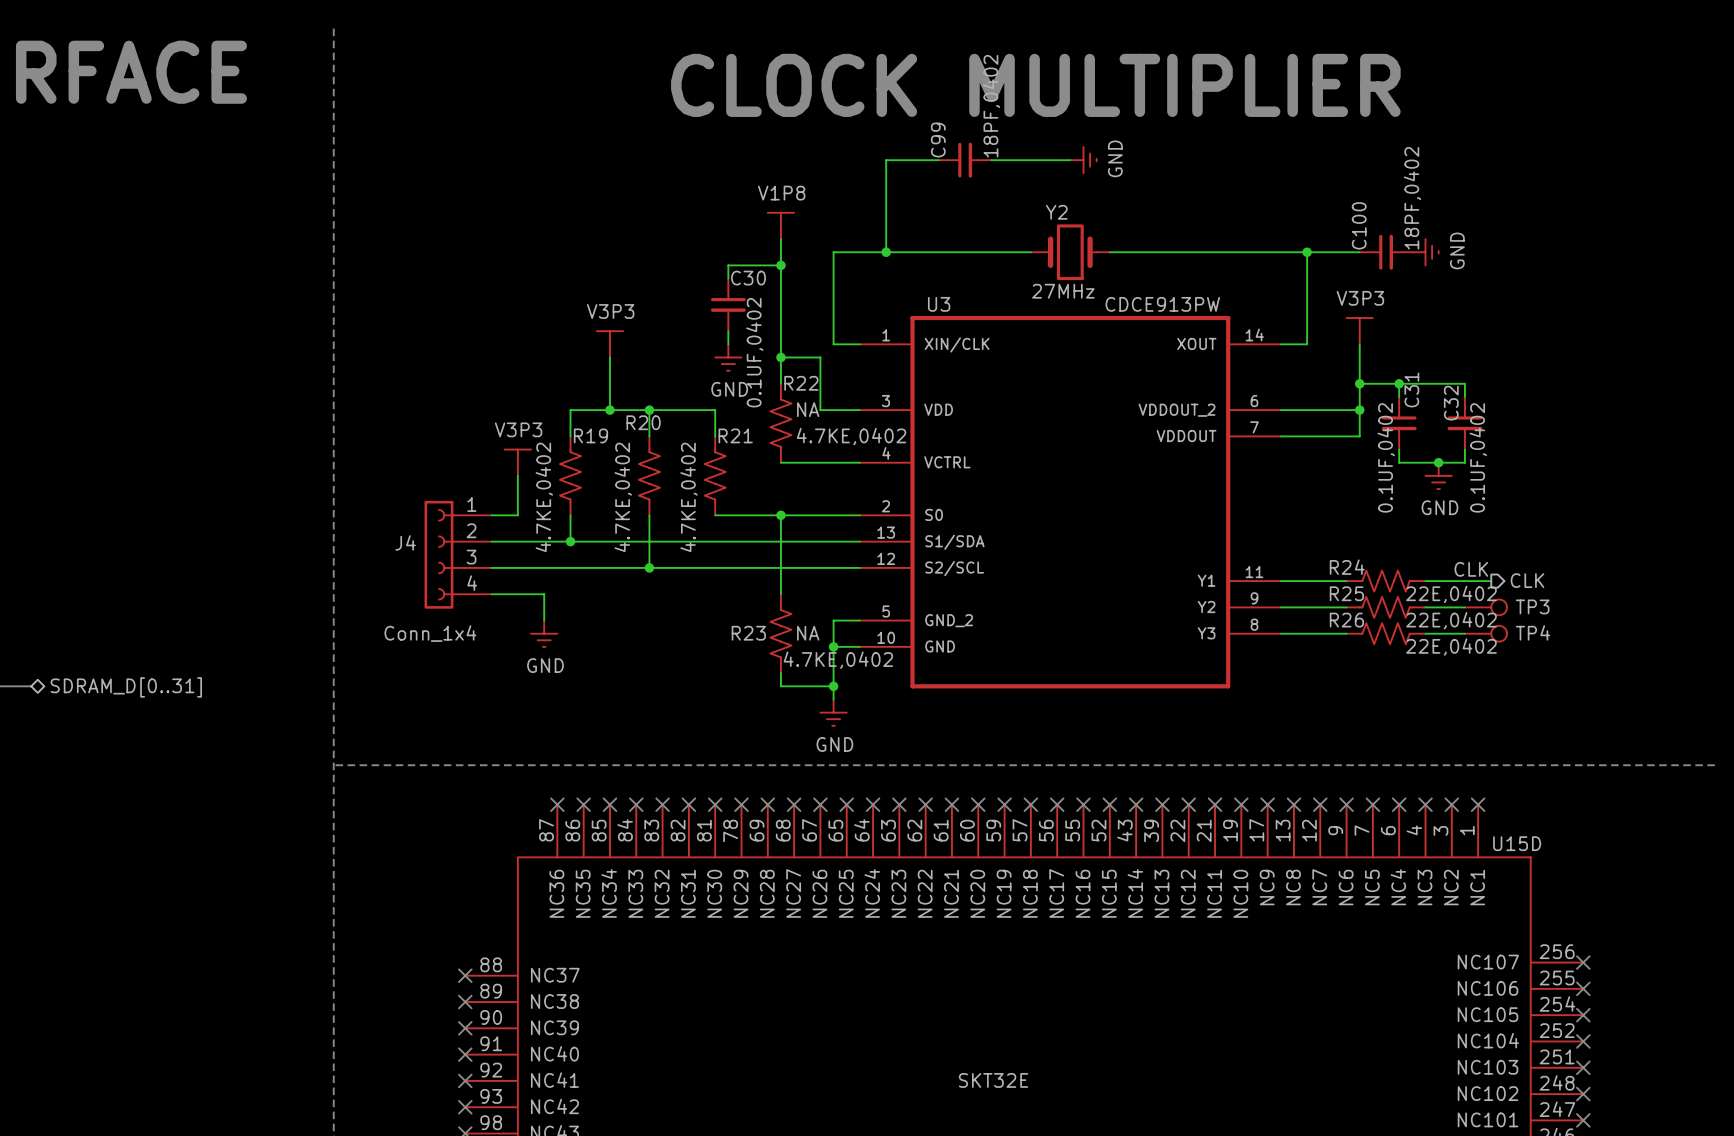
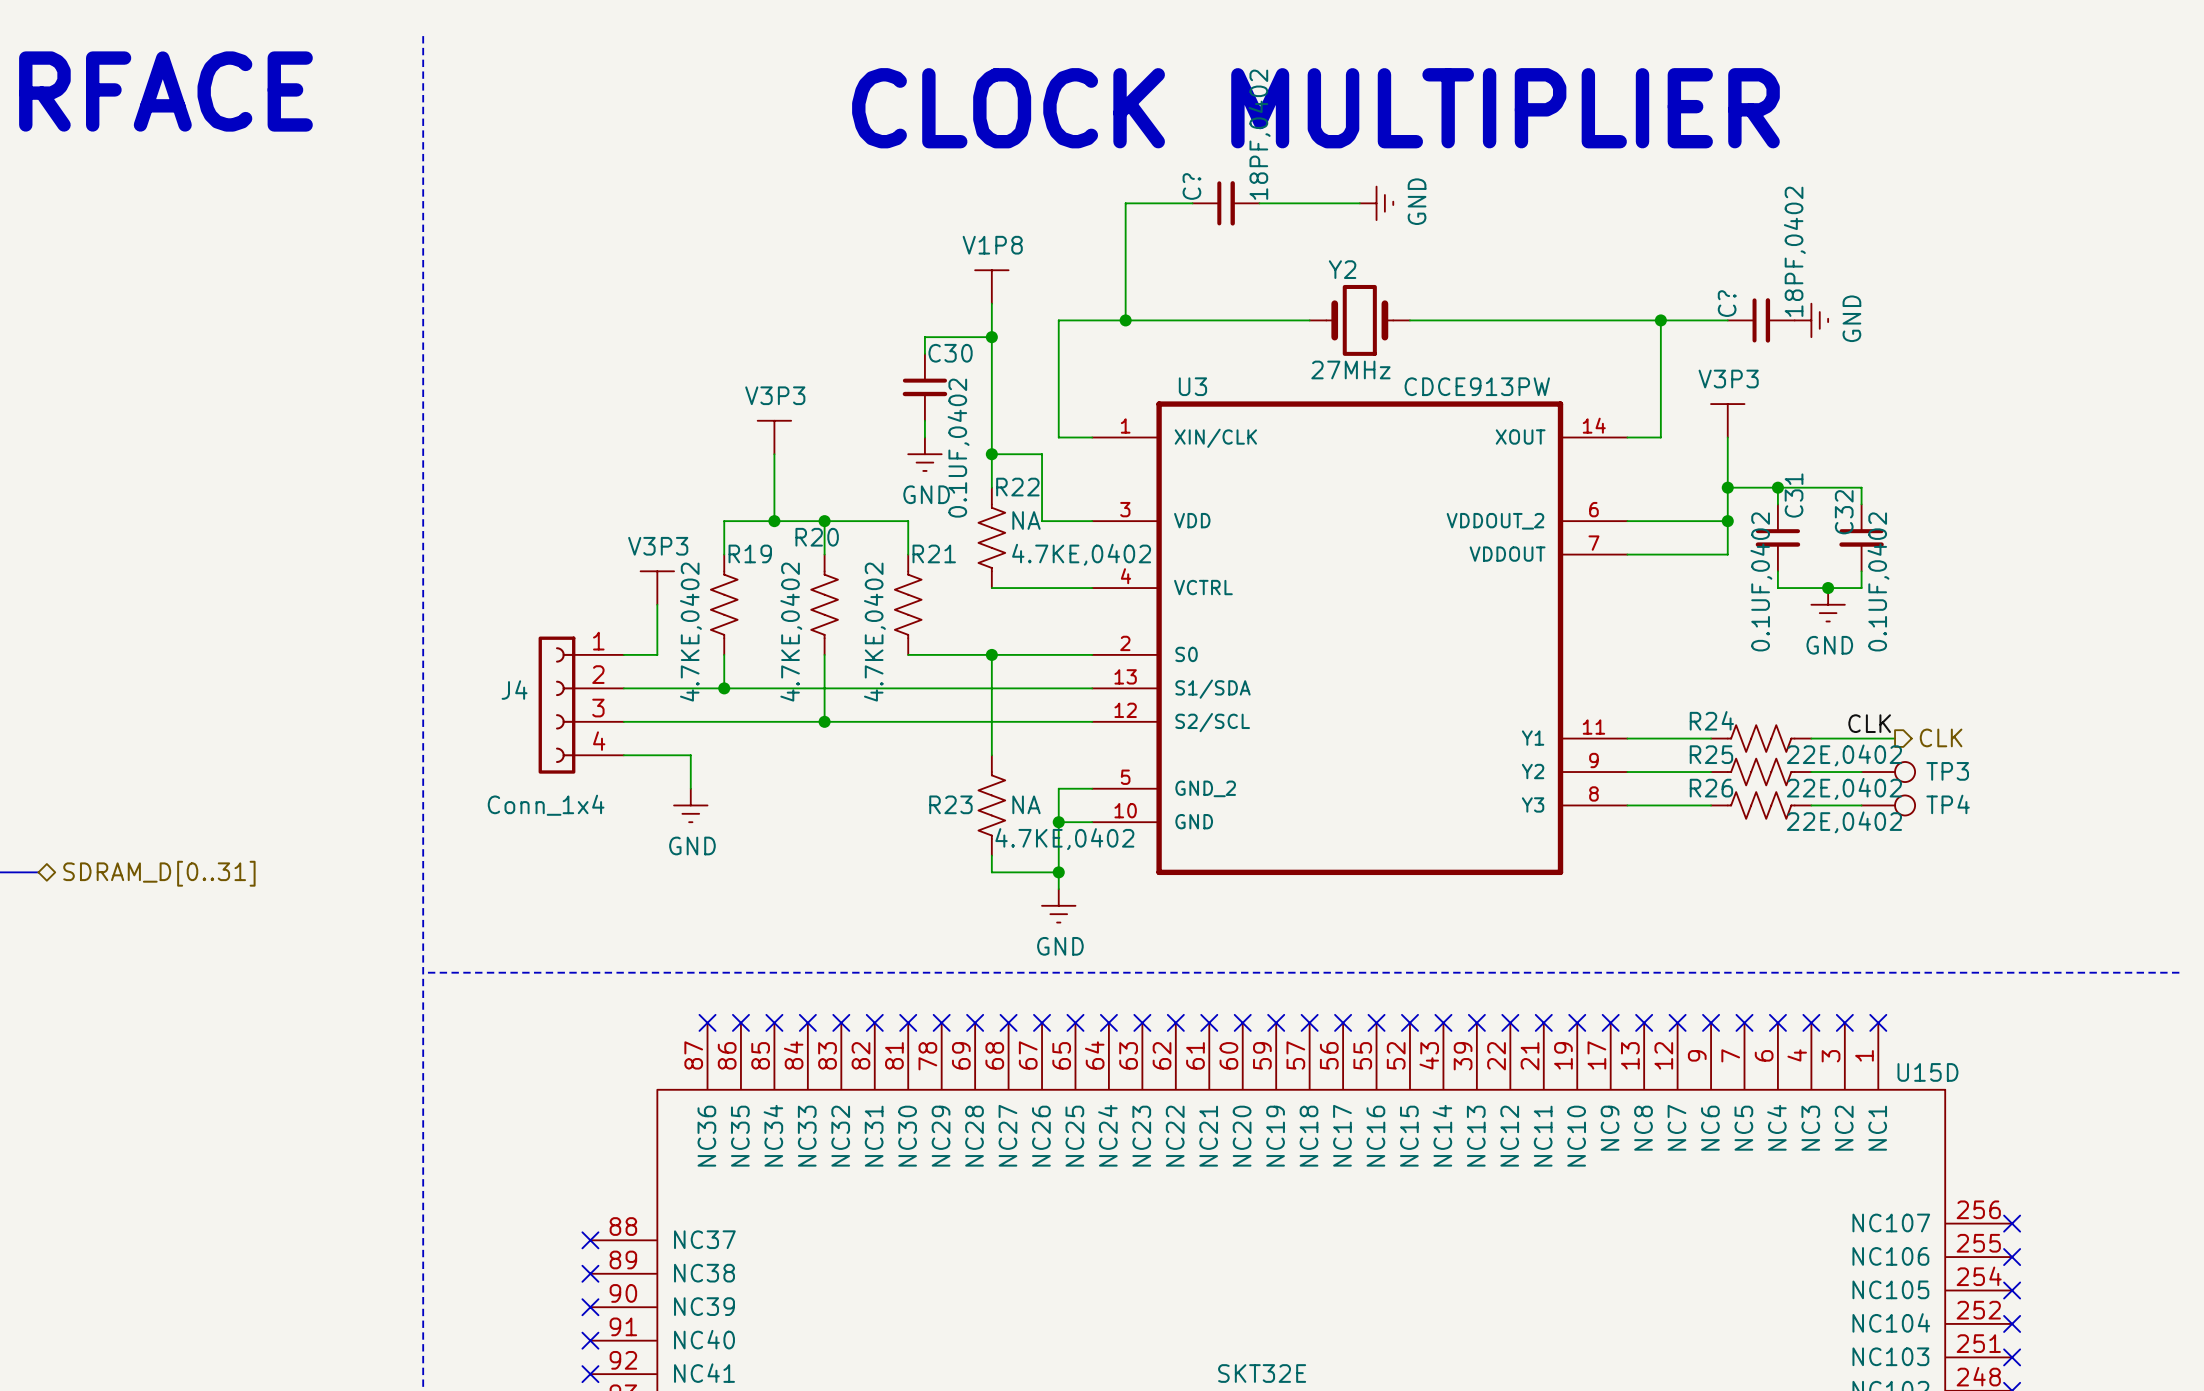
C99 name: C99 (938, 140) -> C? (1191, 186)
C100 name: C100 (1359, 225) -> C? (1727, 303)

